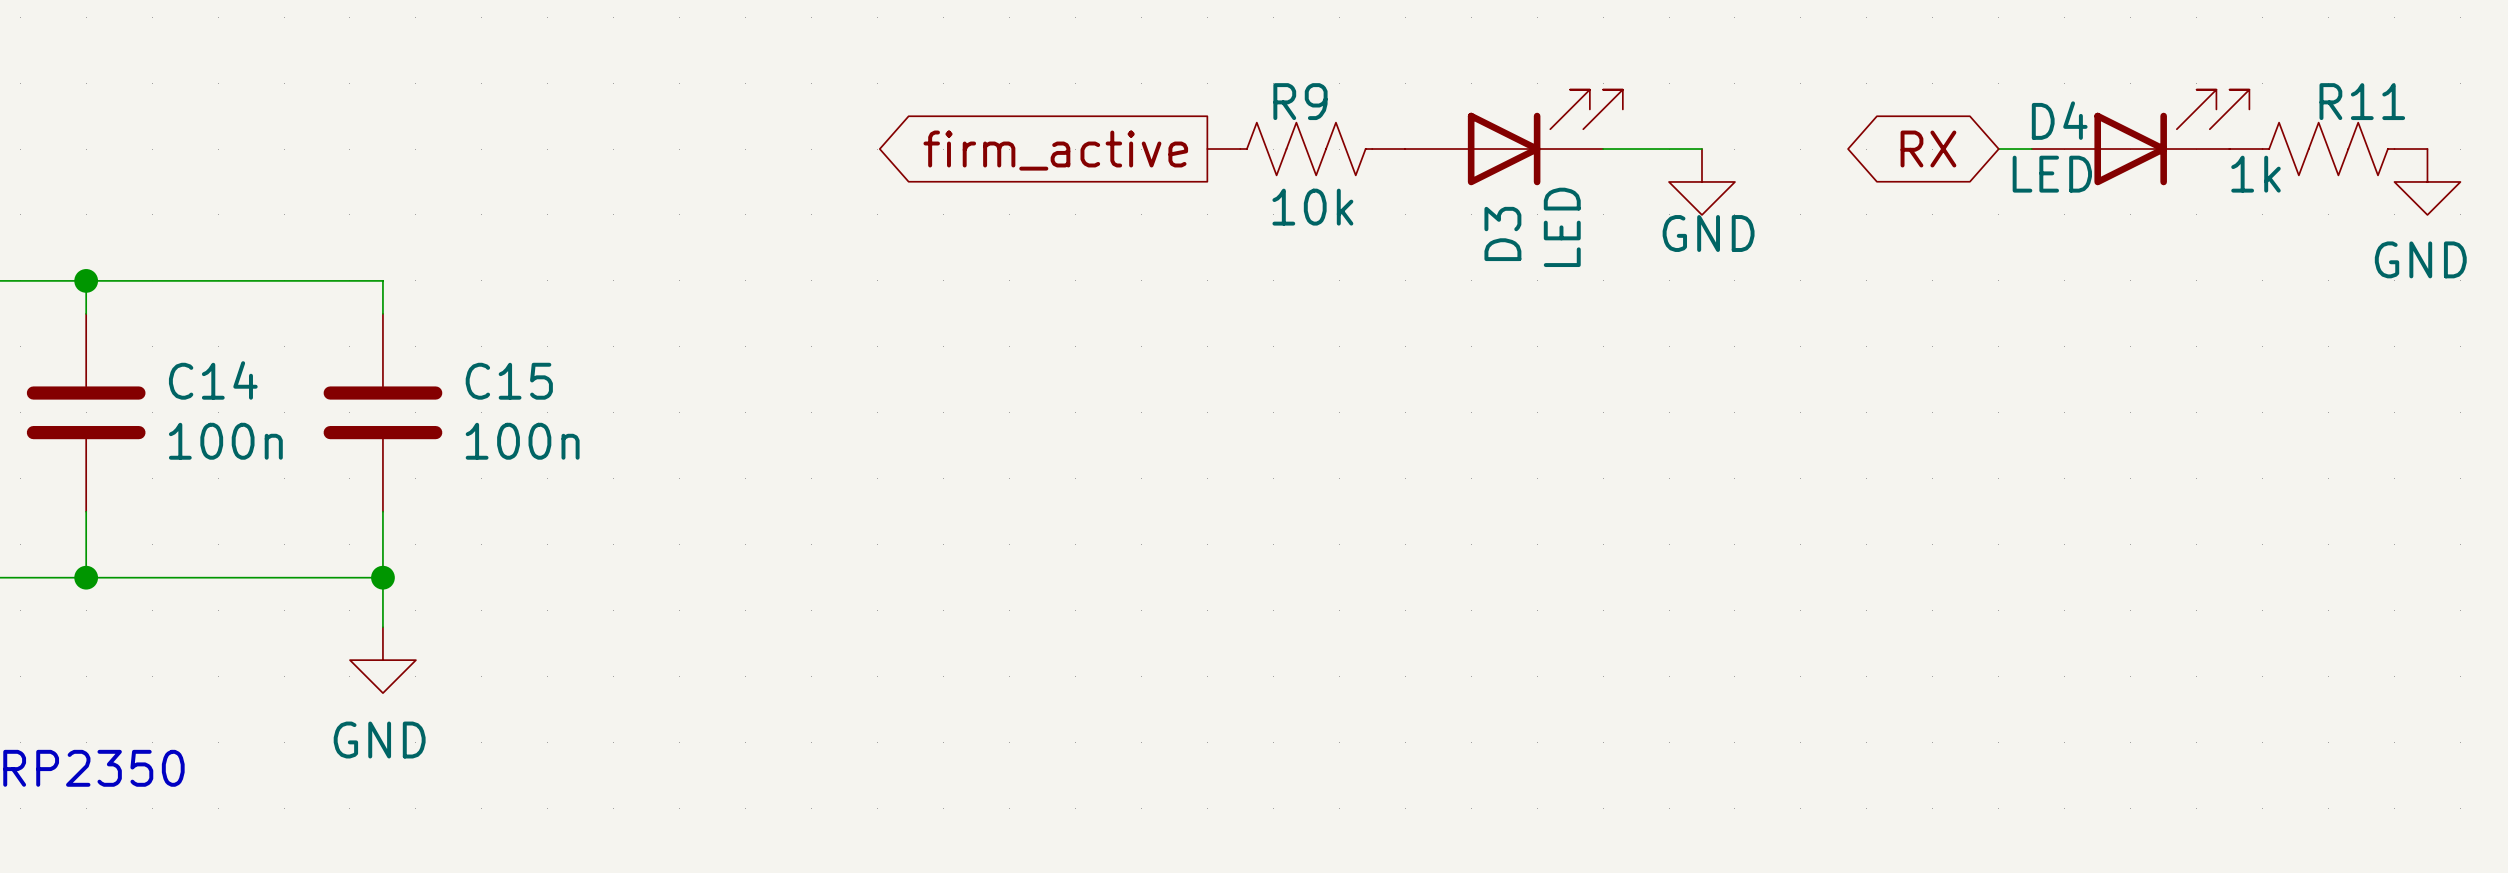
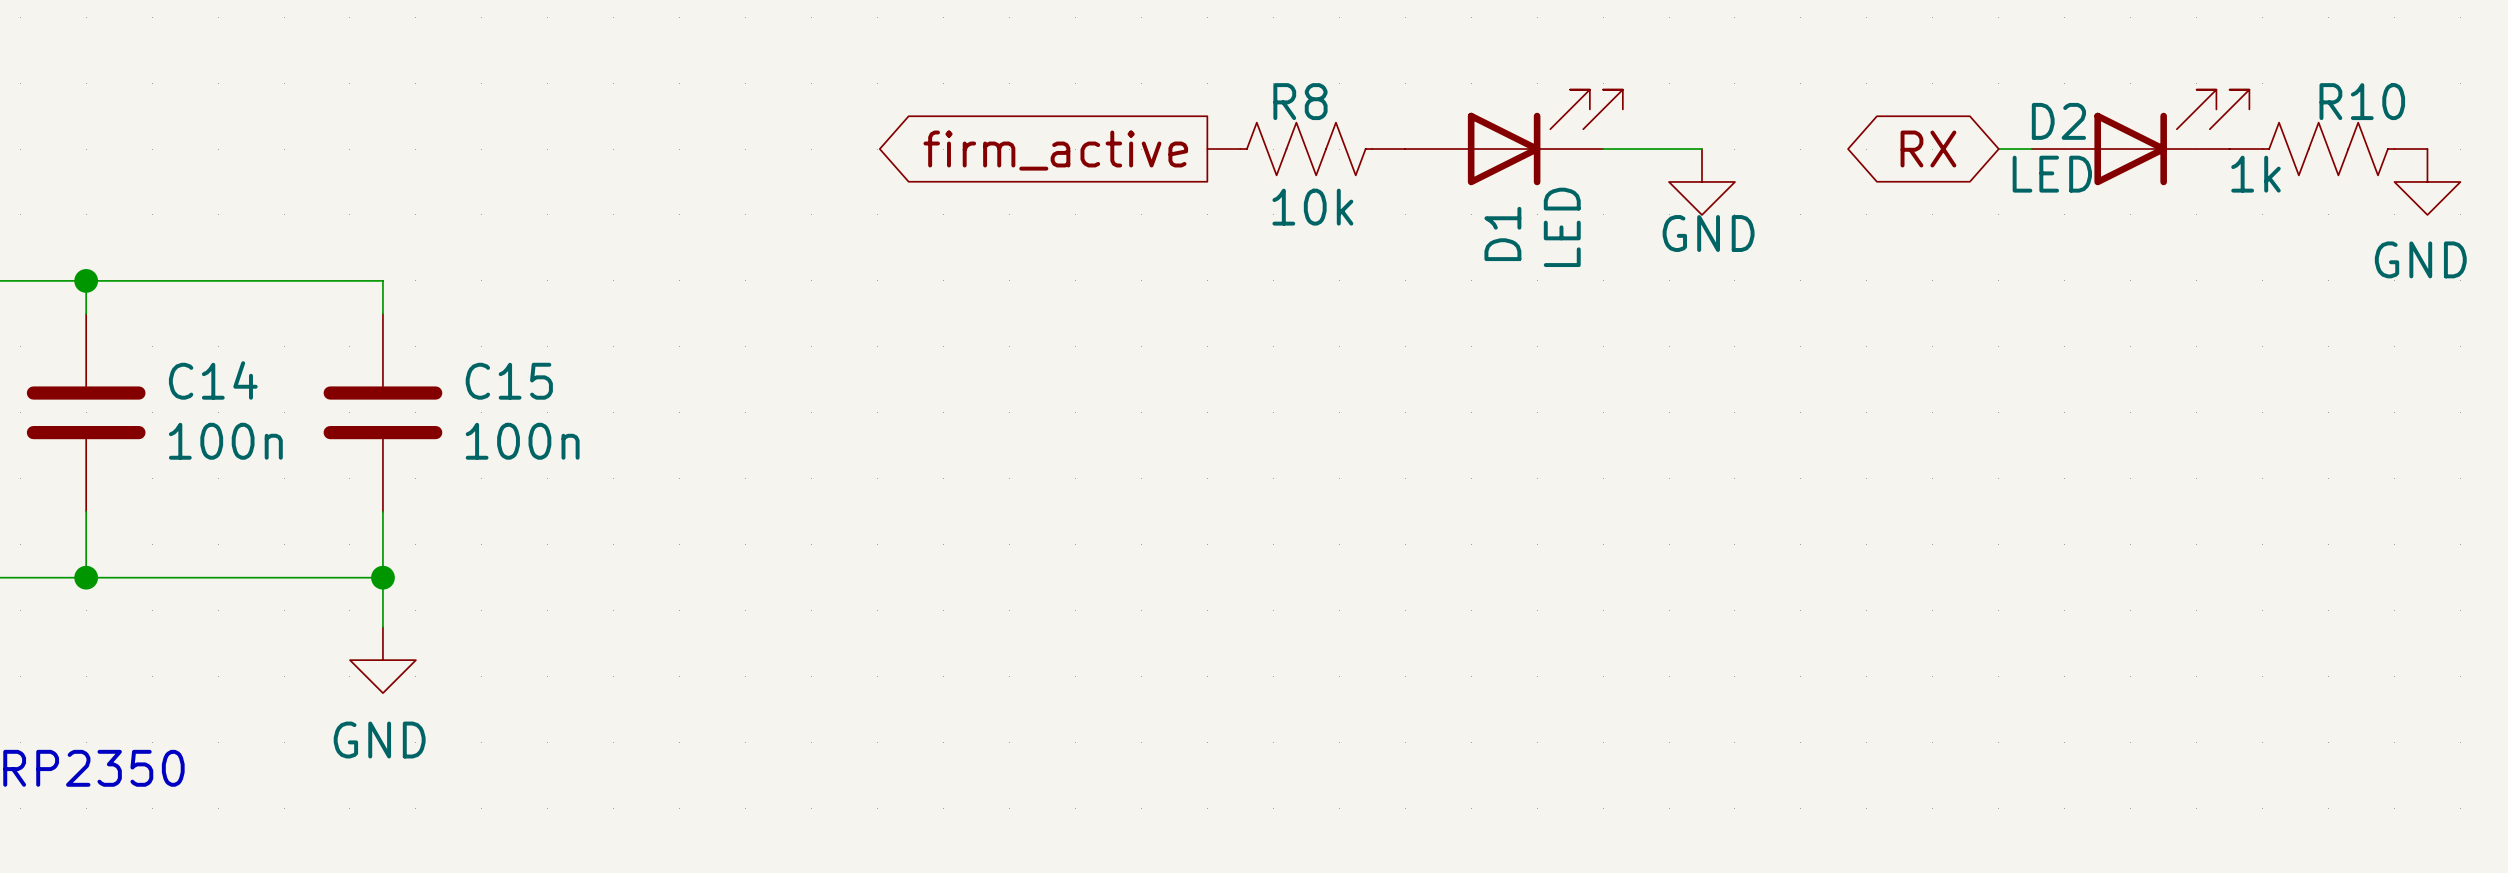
R9 name: R9 (1300, 101) -> R8 (1300, 101)
R11 name: R11 (2362, 101) -> R10 (2362, 101)
D4 name: D4 (2059, 120) -> D2 (2058, 121)
D3 name: D3 (1502, 233) -> D1 (1502, 233)

